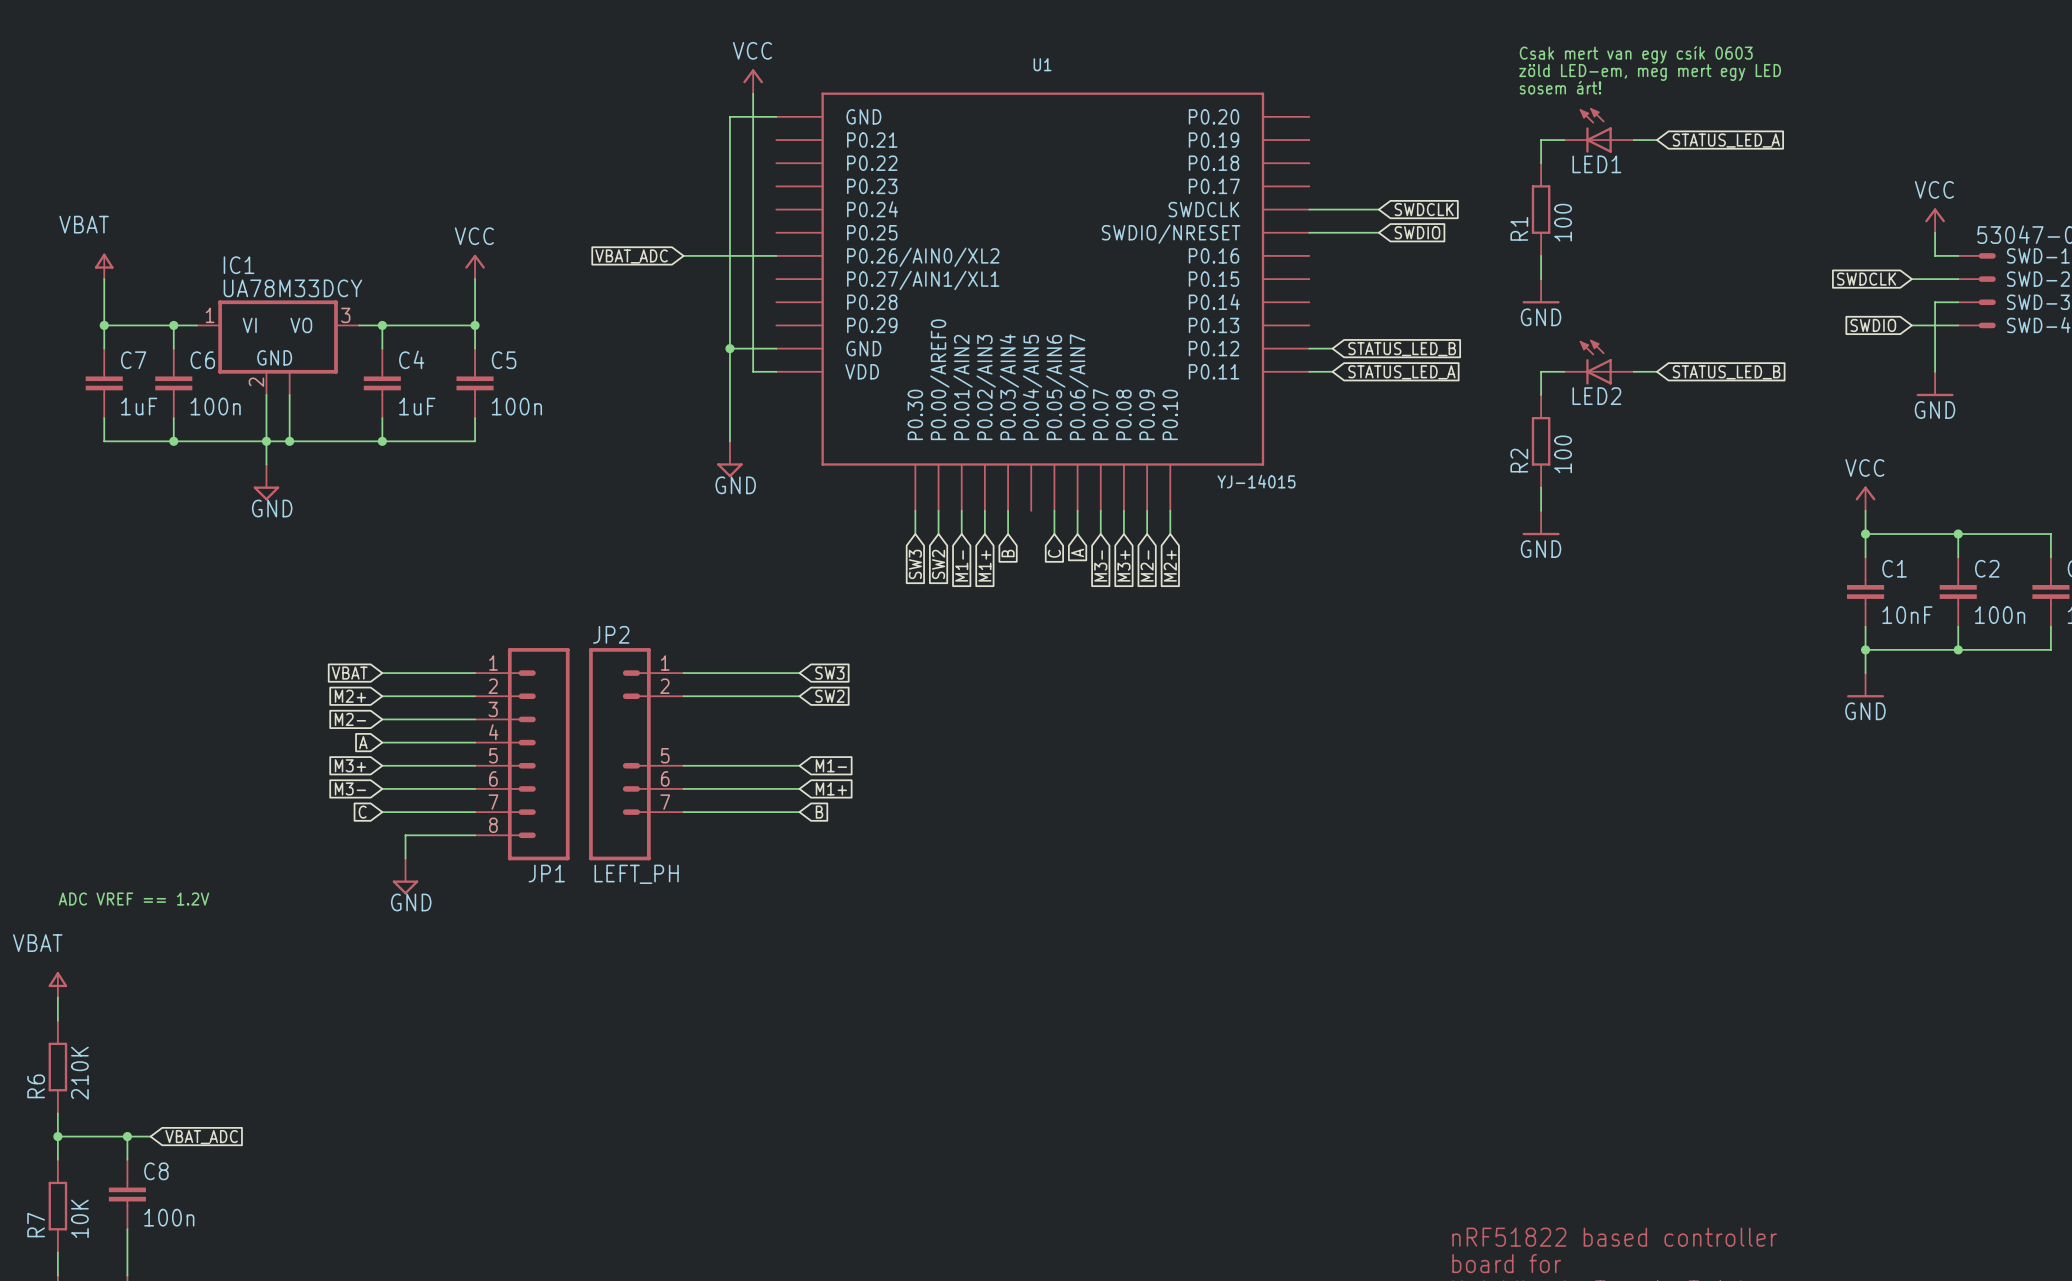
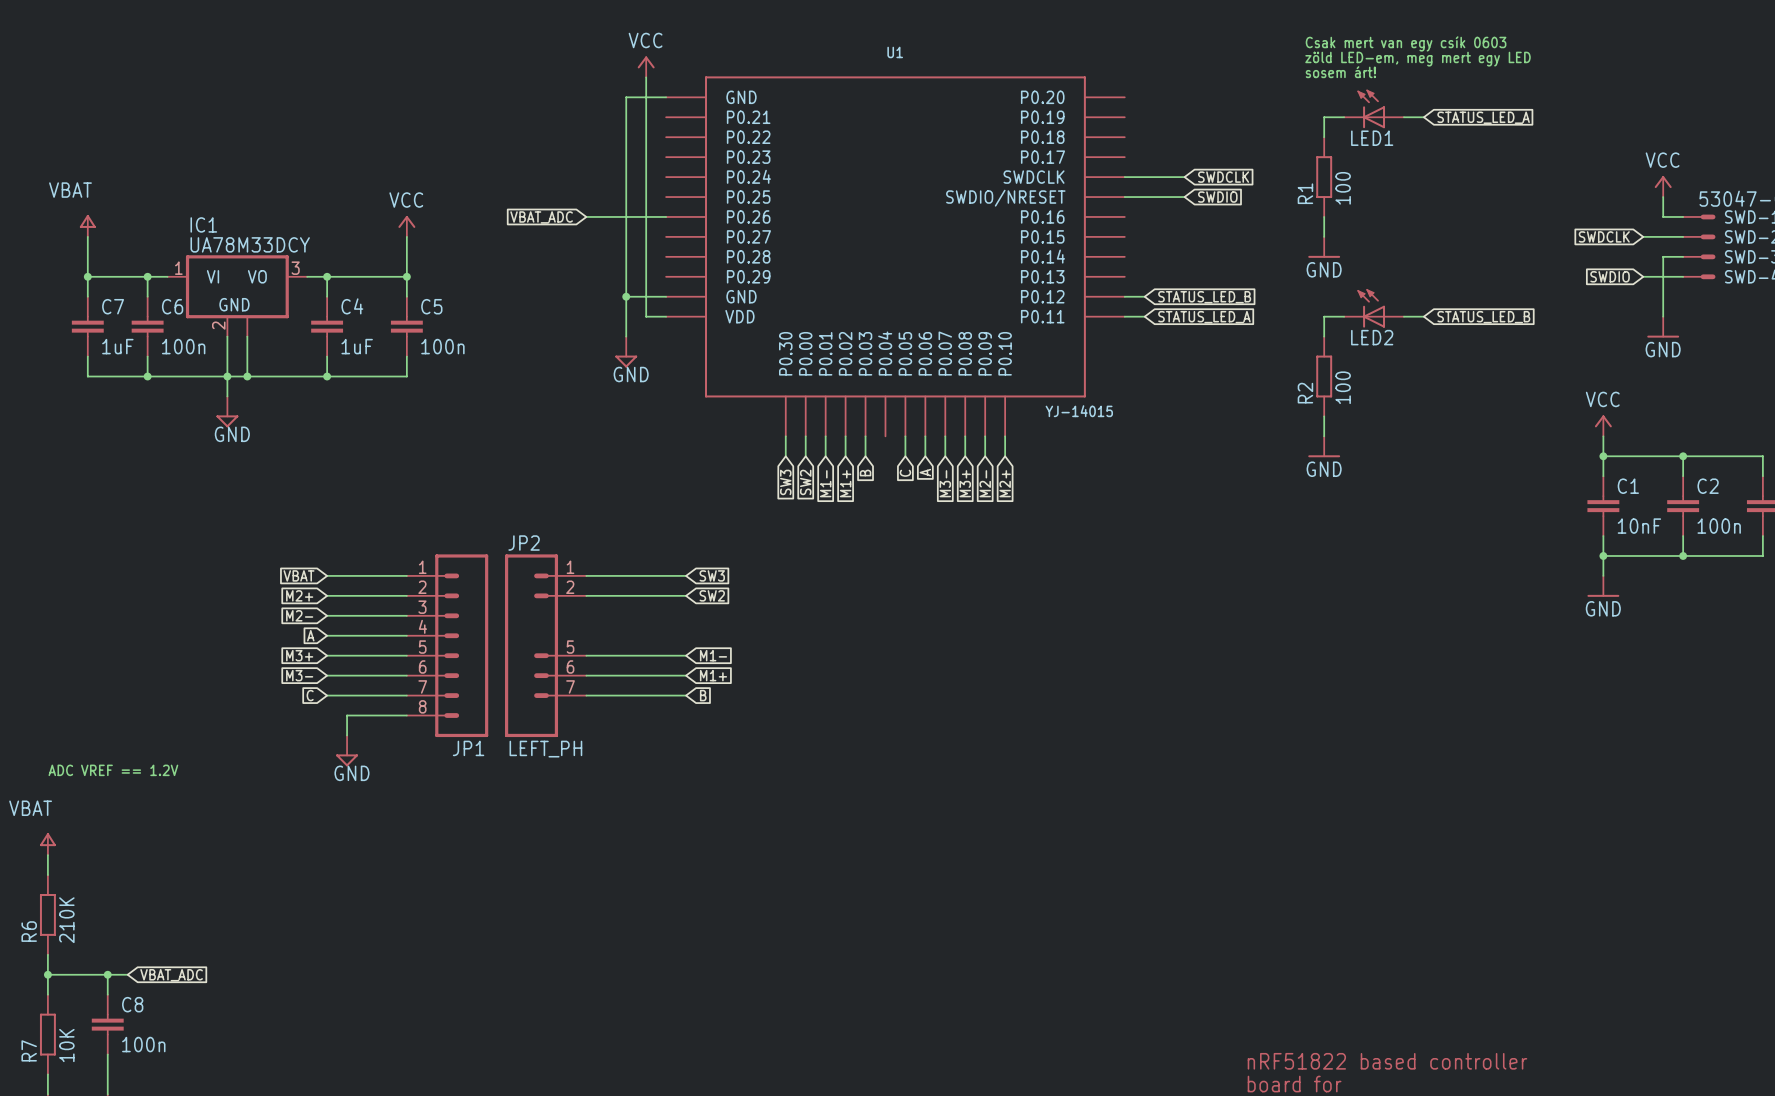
U1 symbol: [776, 92, 1310, 511] -> [666, 76, 1125, 437]
power symbol position: GND (729, 459) -> GND (626, 352)

